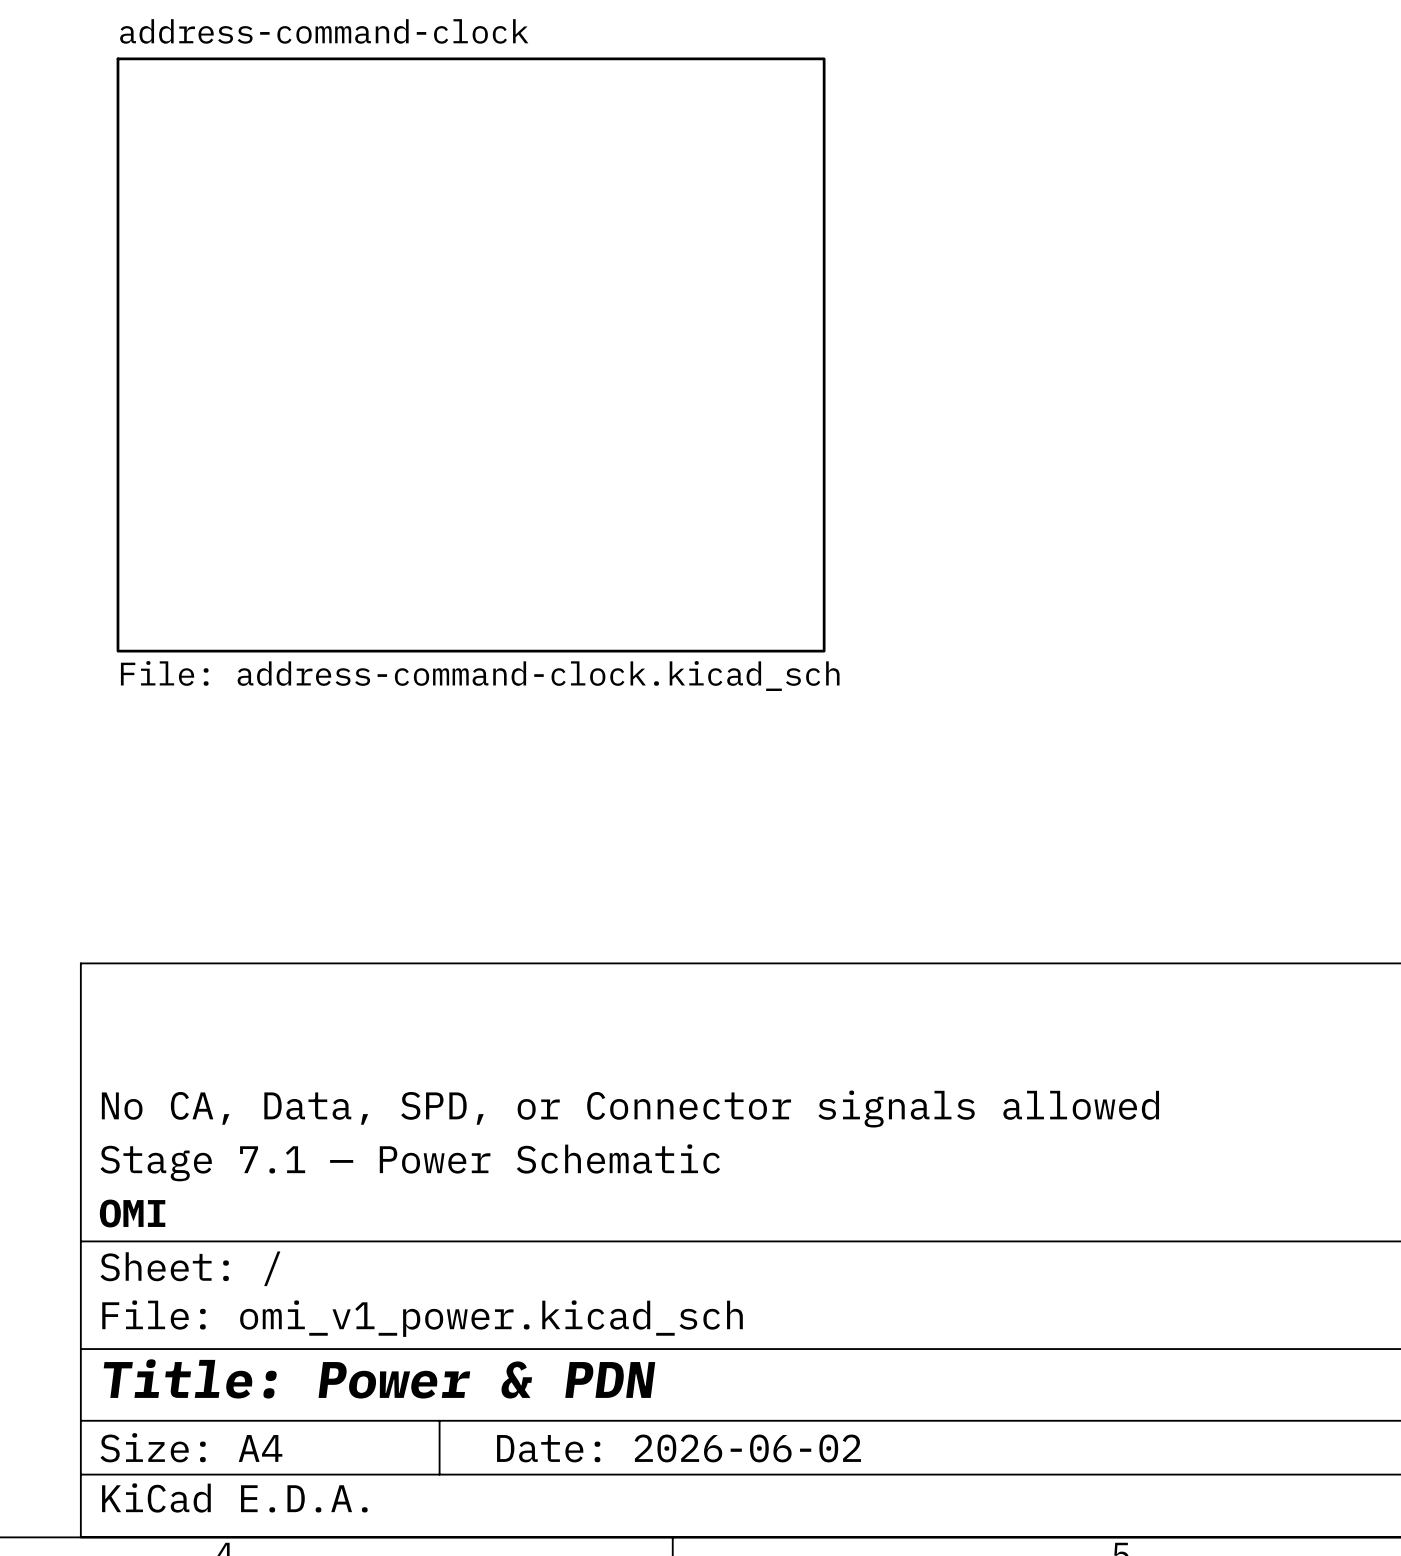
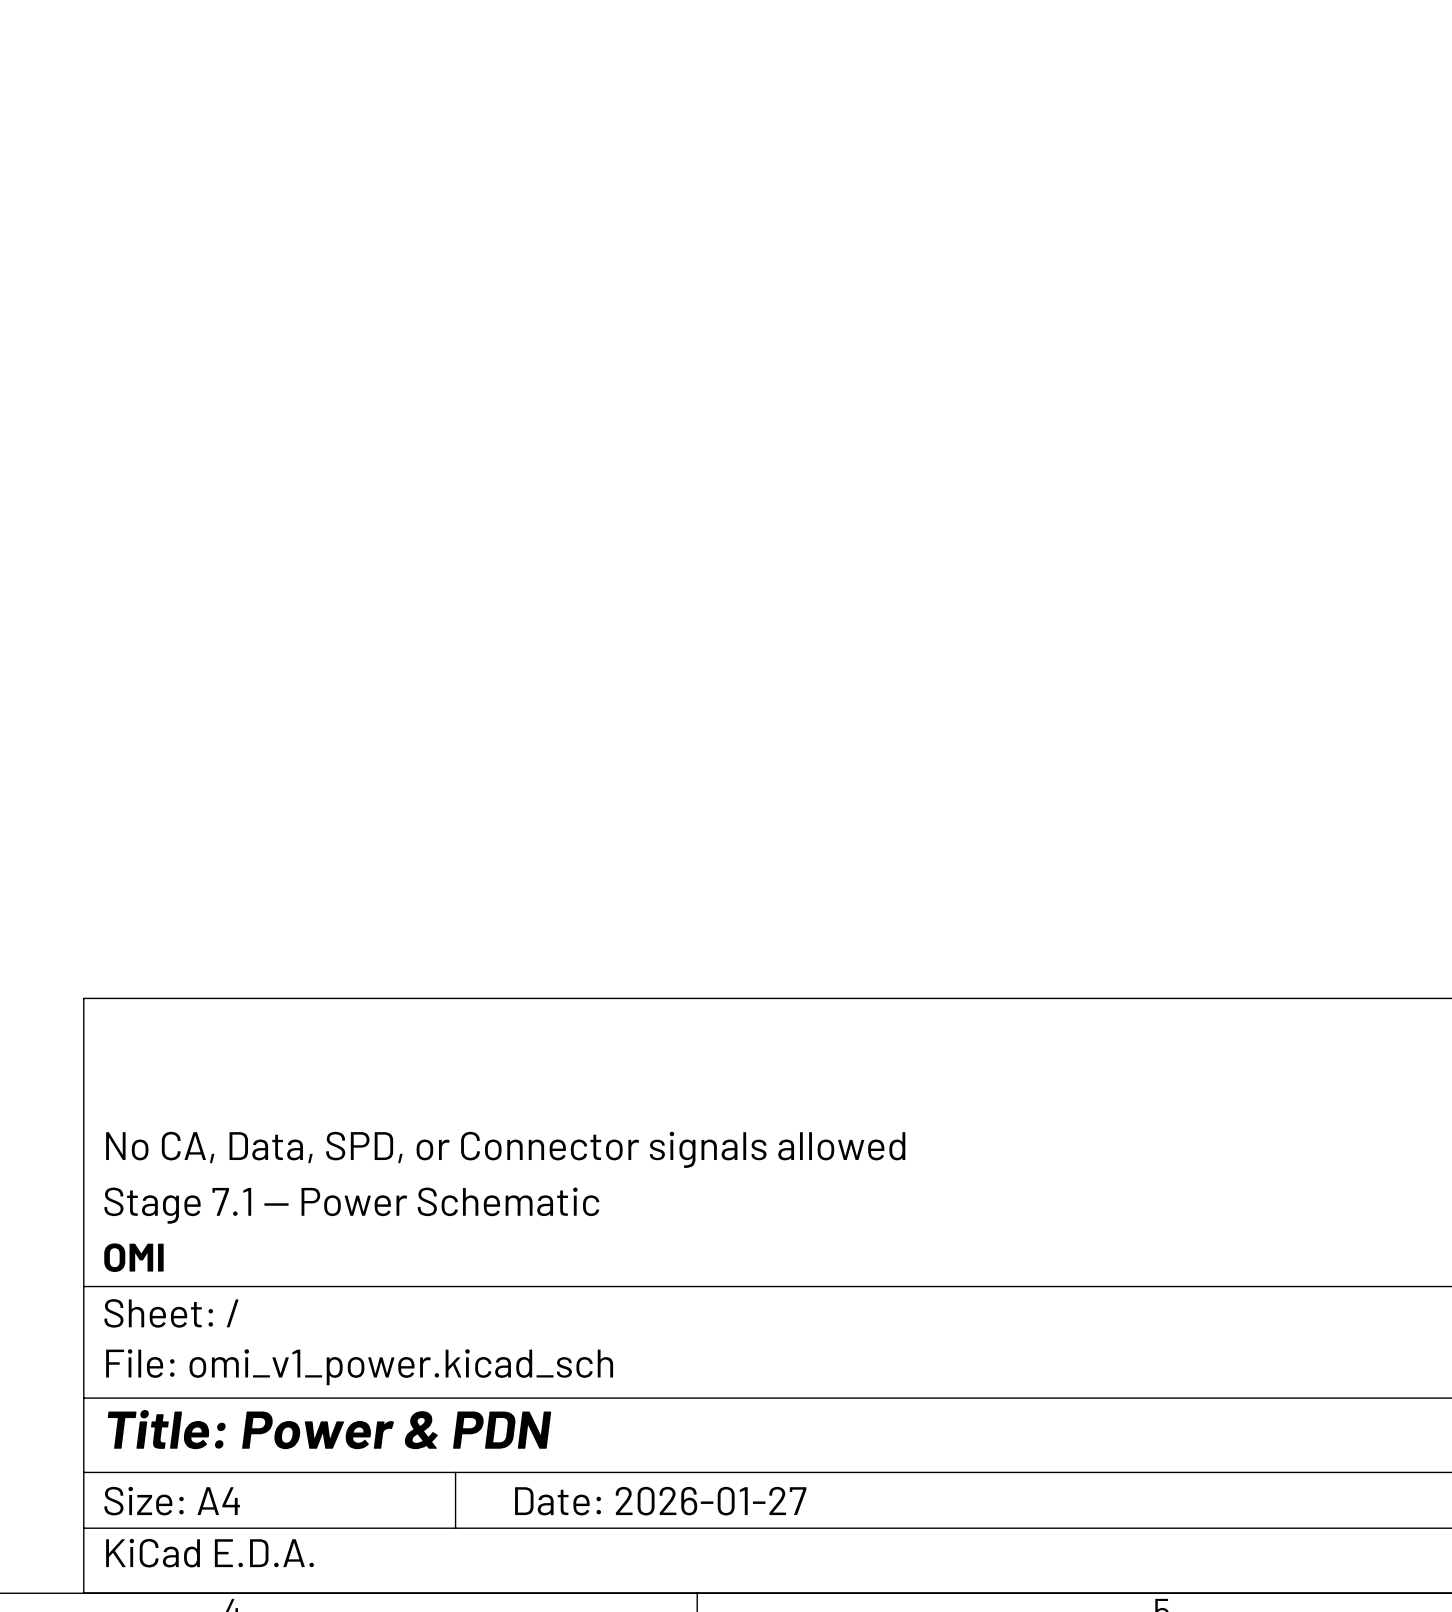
sheet address-command-clock: File: address-command-clock.kicad_sch (471, 354) -> none
title block: Date: 2026-06-02 (679, 1448) -> Date: 2026-01-27 (660, 1501)

